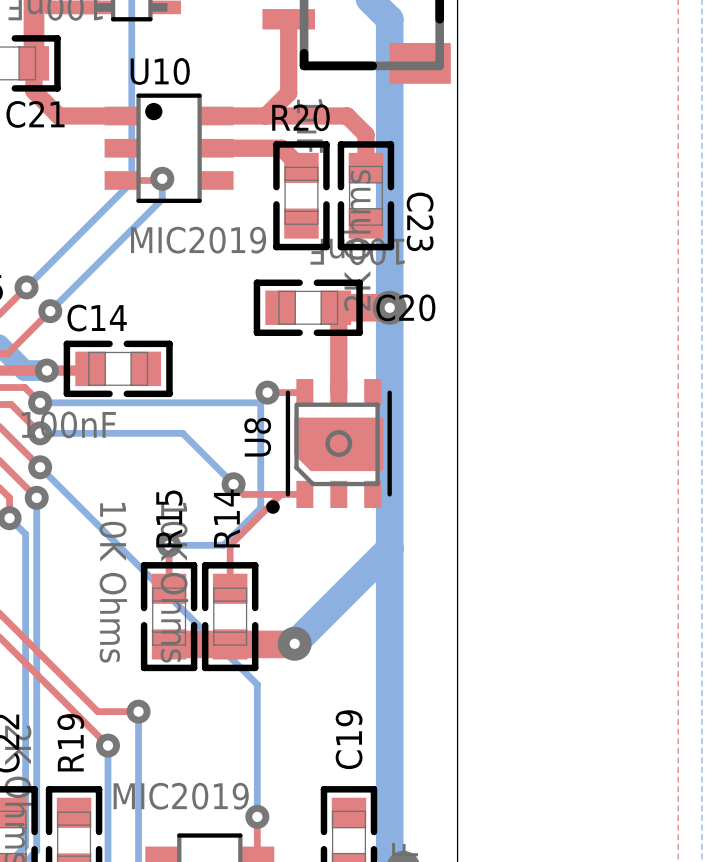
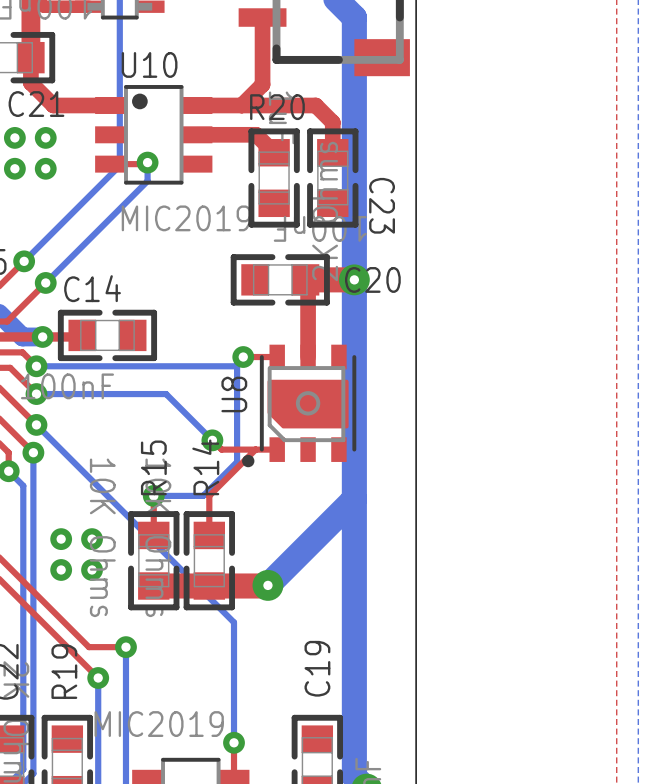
via: none -> (14, 137)
via: none -> (45, 137)
via: none -> (14, 168)
via: none -> (45, 168)
via: none -> (61, 539)
via: none -> (92, 539)
via: none -> (61, 569)
via: none -> (92, 569)

